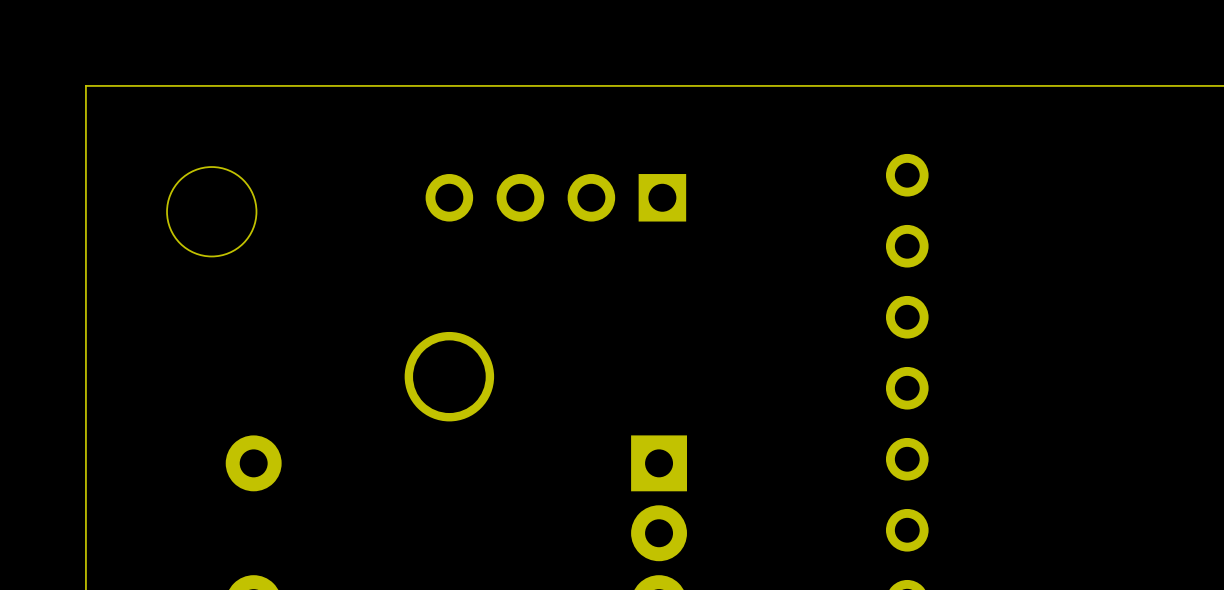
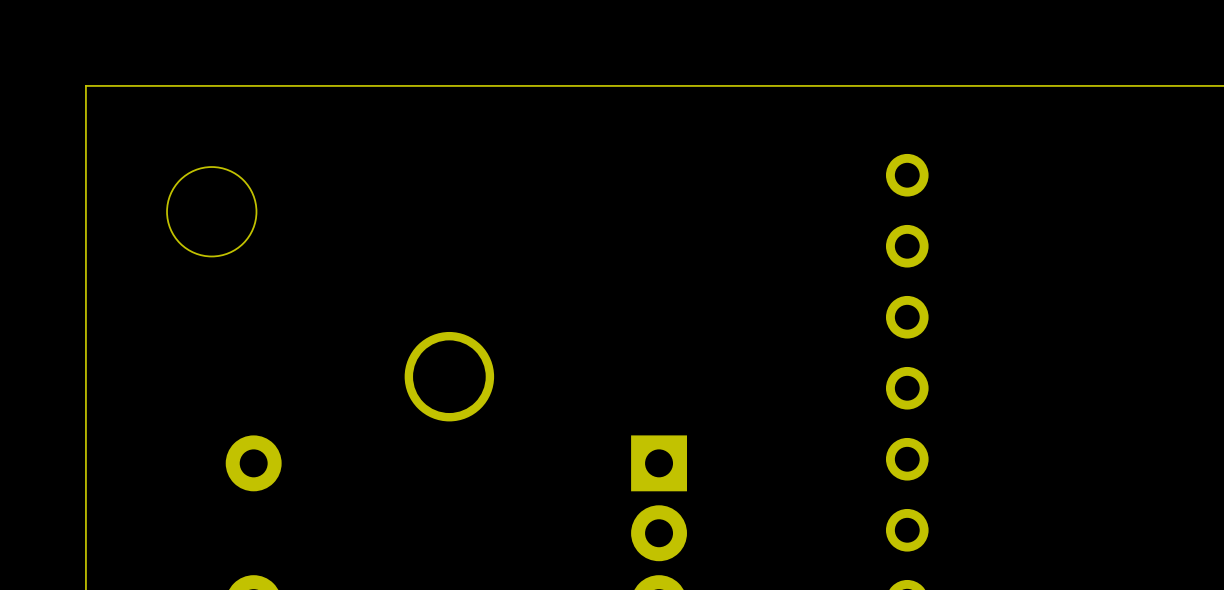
part: (555, 197) -> none

